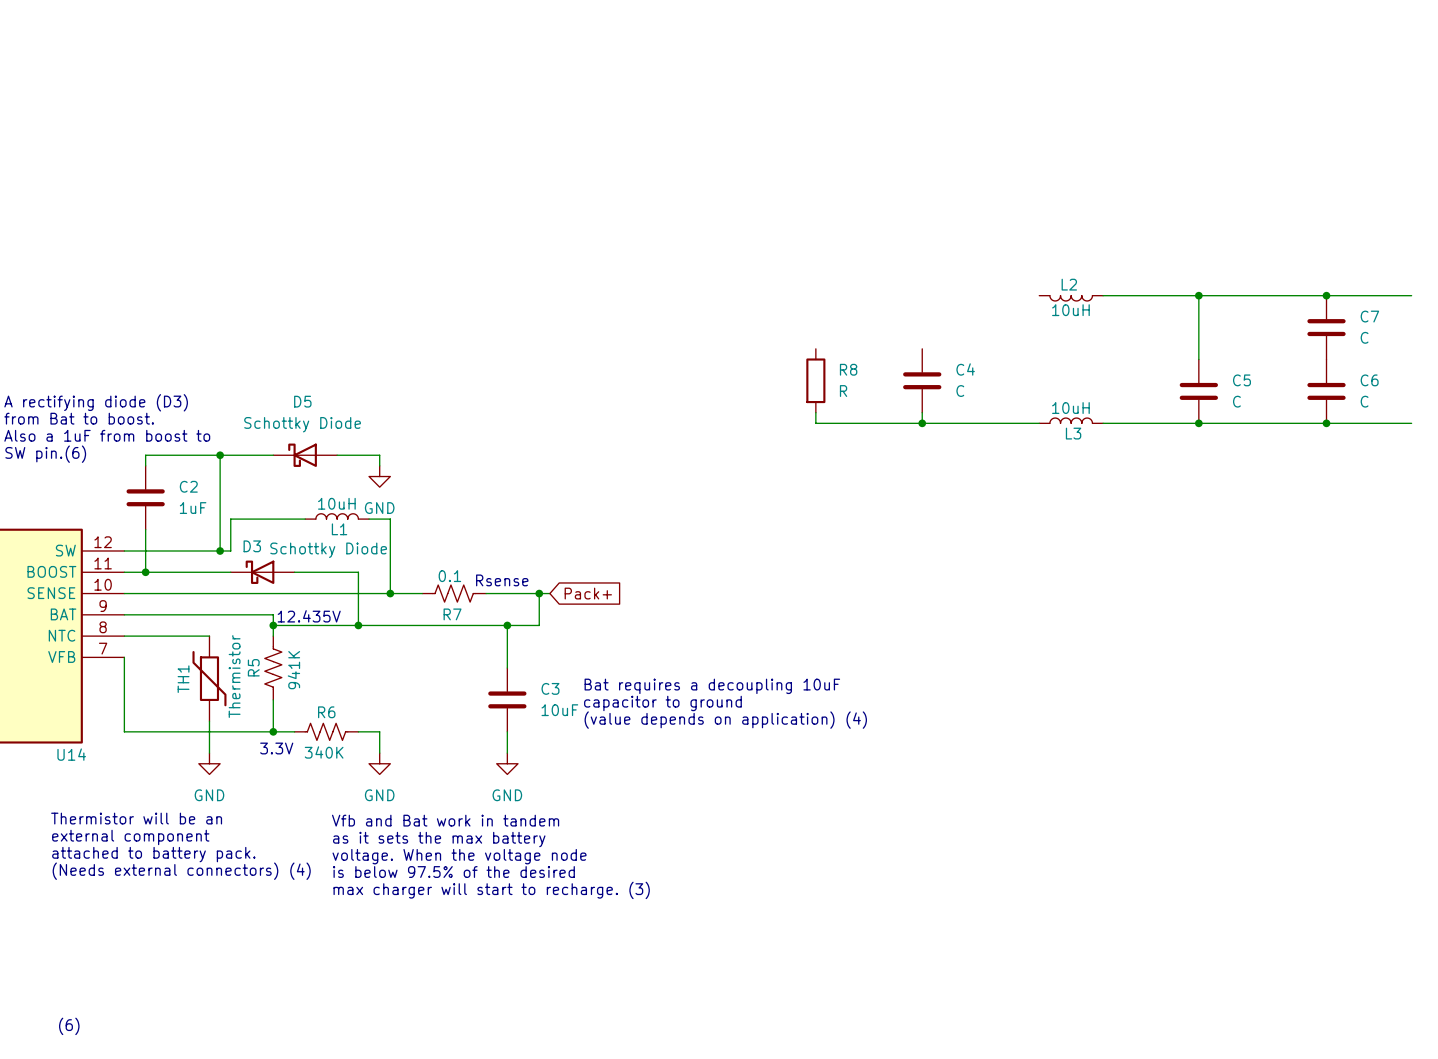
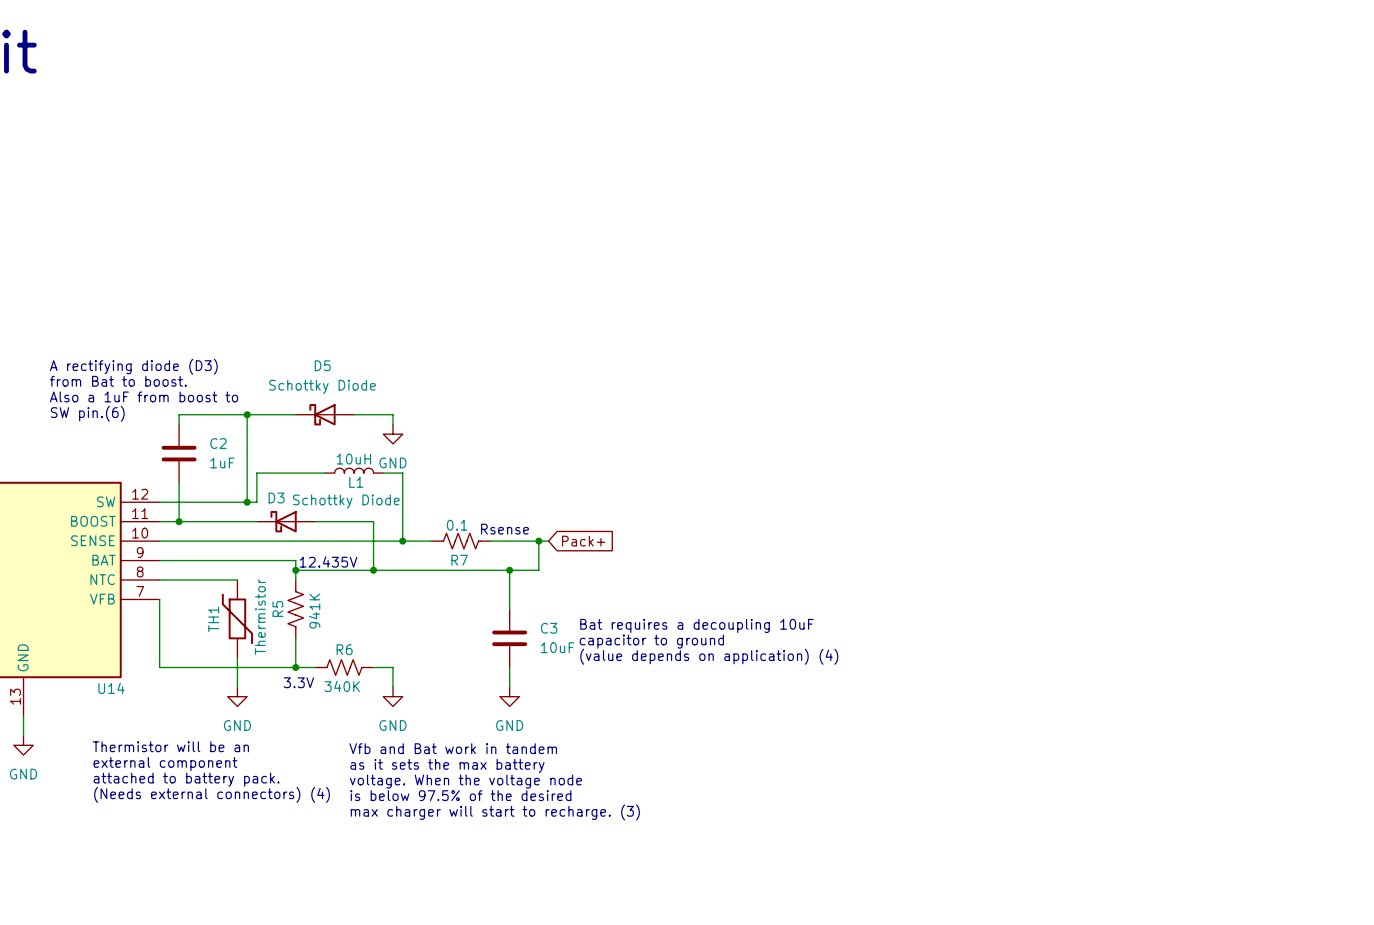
wire: (1103, 295) (1411, 295) -> none
wire: (1198, 295) (1198, 359) -> none
junction: (1198, 295) -> none
junction: (1326, 295) -> none
L2: 10uH (1071, 298) -> none
C7: C (1326, 327) -> none
R8: R (815, 380) -> none
C4: C (922, 380) -> none
C5: C (1198, 391) -> none
C6: C (1326, 391) -> none
wire: (815, 412) (815, 423) (1039, 423) -> none
wire: (922, 412) (922, 423) -> none
L3: 10uH (1071, 420) -> none
junction: (922, 423) -> none
wire: (1103, 423) (1411, 423) -> none
junction: (1198, 423) -> none
junction: (1326, 423) -> none

